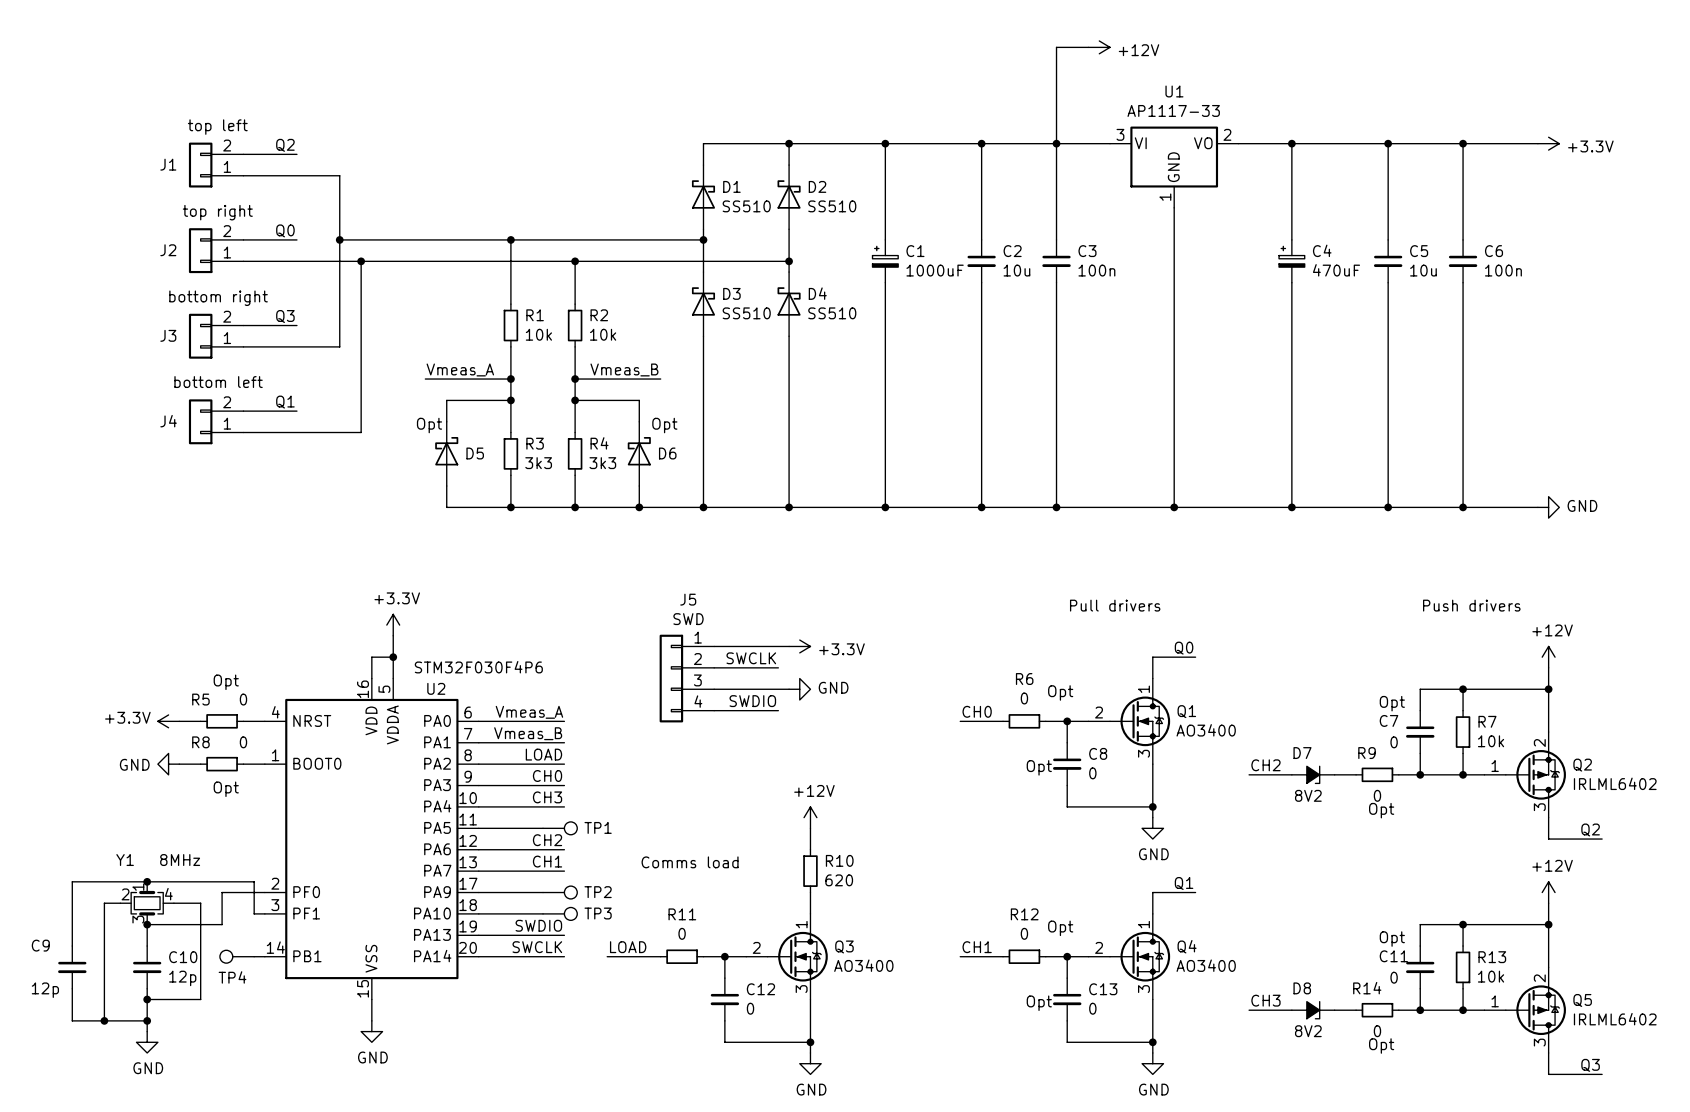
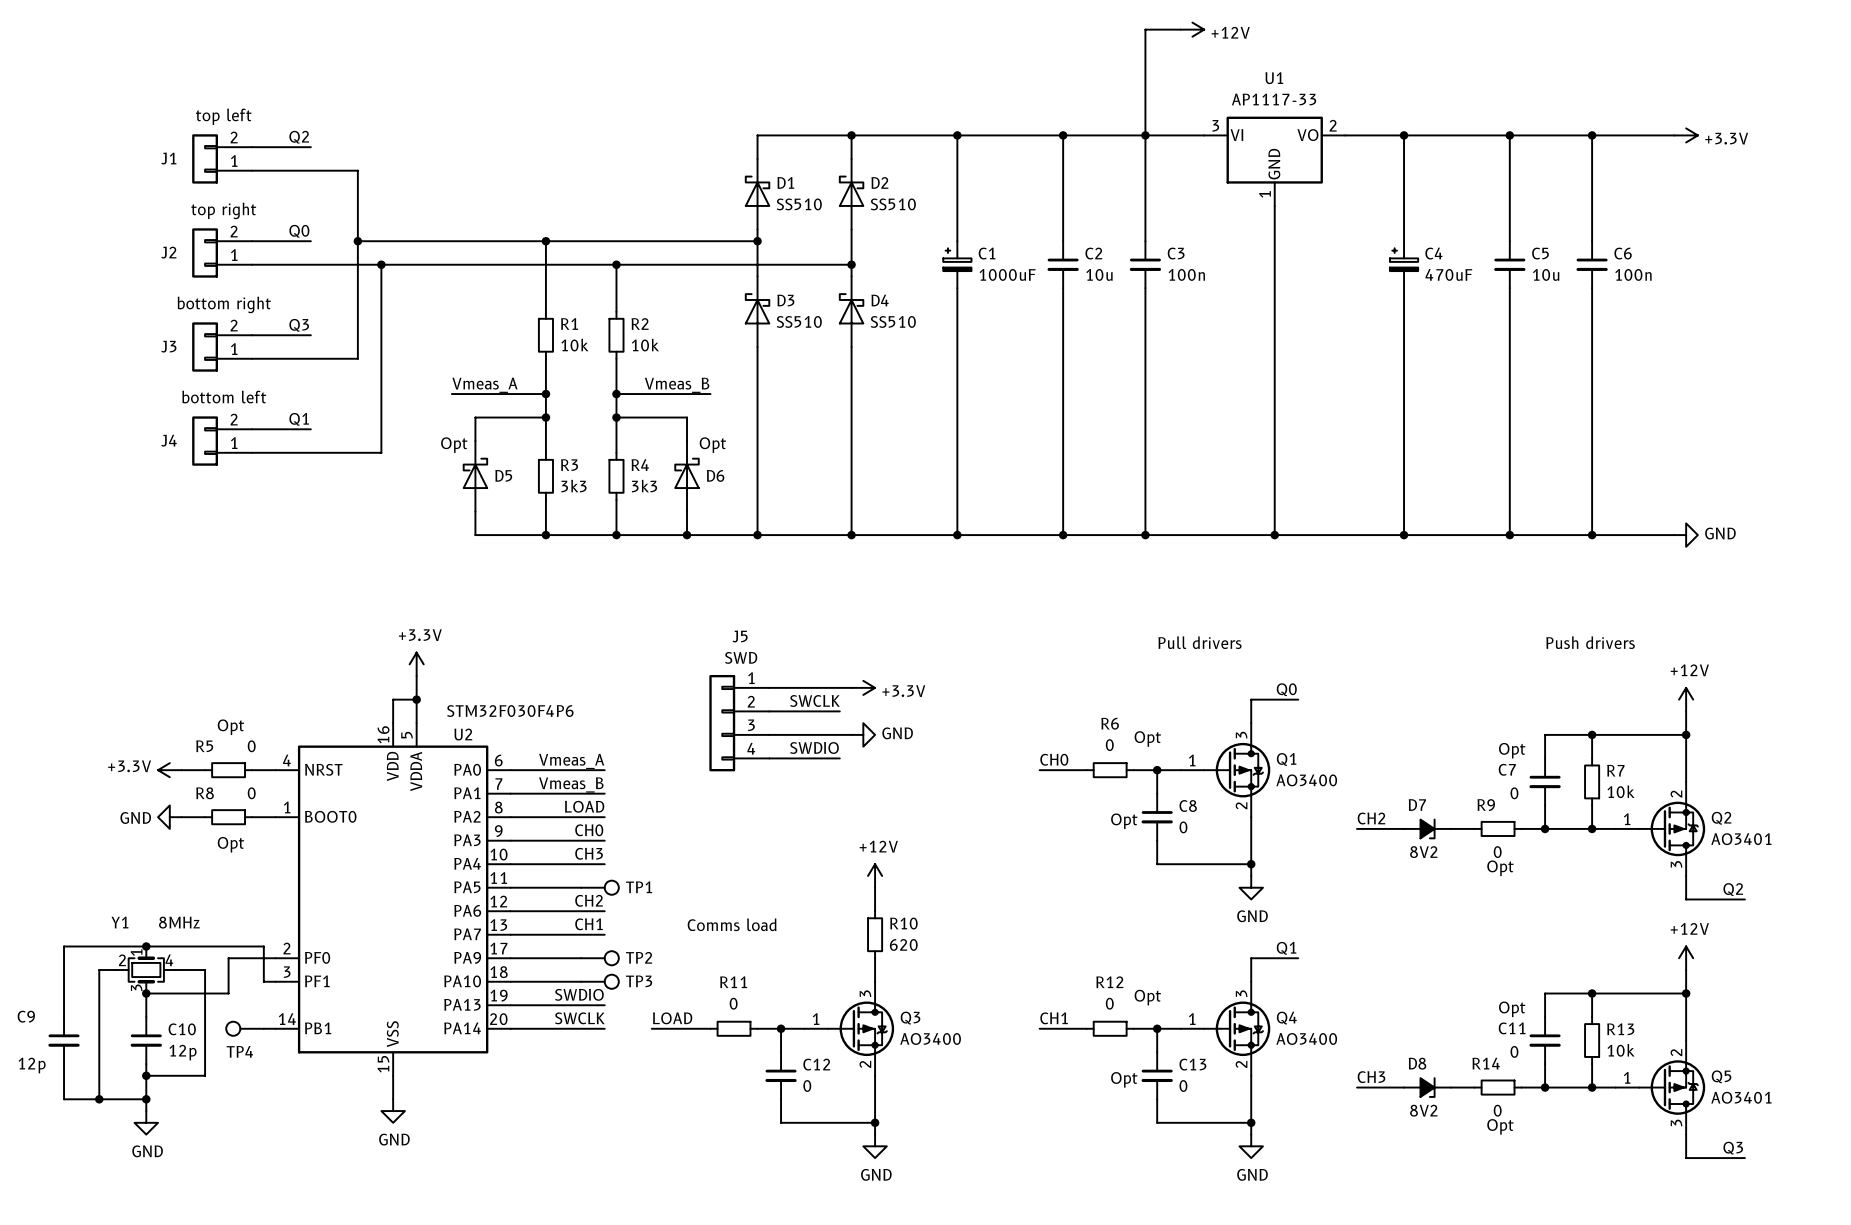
Q1 symbol: [1088, 678, 1171, 765] -> [1180, 723, 1271, 818]
Q2 value: IRLML6402 (1615, 783) -> AO3401 (1741, 839)
Q3 symbol: [746, 913, 828, 1000] -> [804, 981, 895, 1076]
Q4 symbol: [1088, 913, 1171, 1000] -> [1180, 981, 1271, 1076]
Q5 value: IRLML6402 (1615, 1019) -> AO3401 (1741, 1097)

